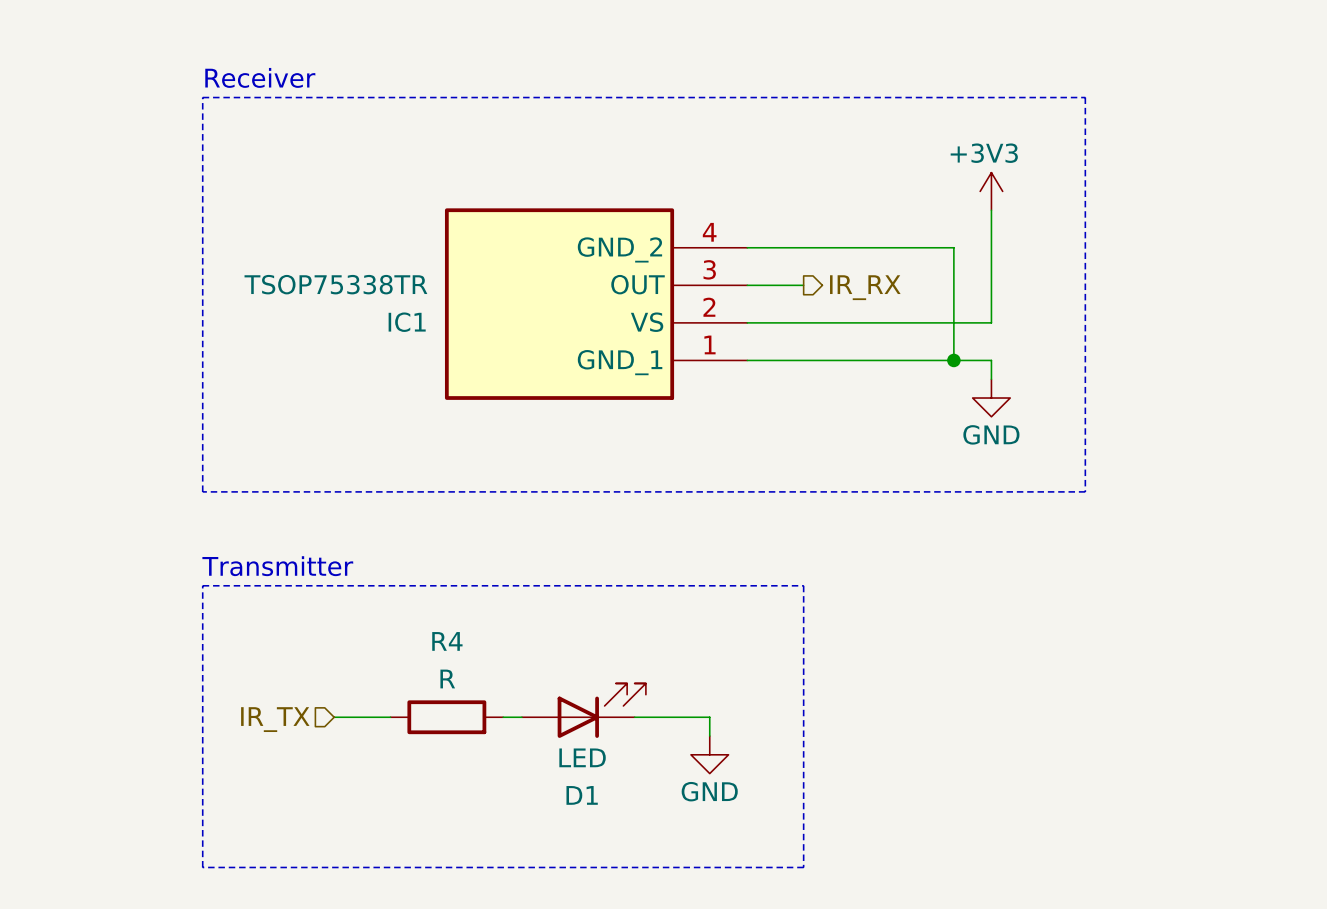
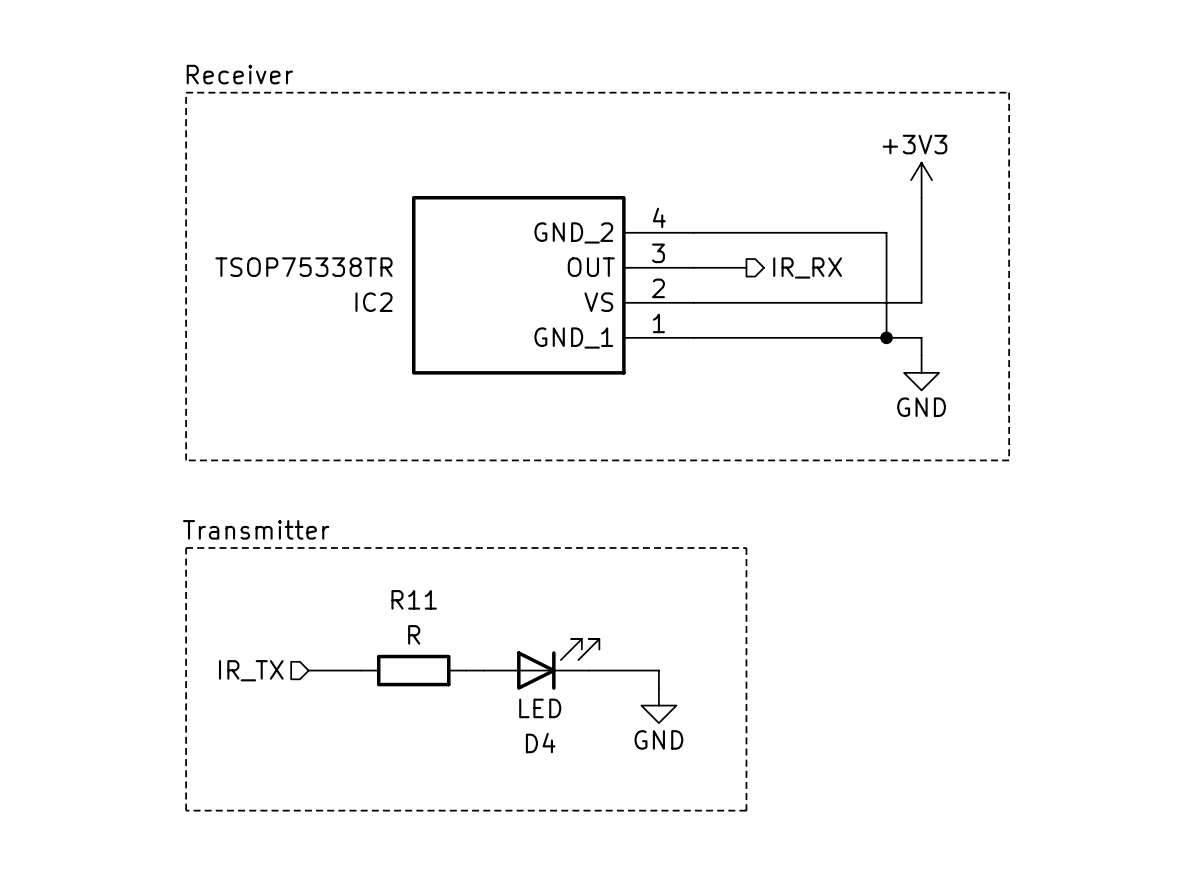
IC1 name: IC1 (407, 322) -> IC2 (374, 302)
R4 name: R4 (447, 641) -> R11 (414, 599)
D1 name: D1 (582, 795) -> D4 (540, 743)

